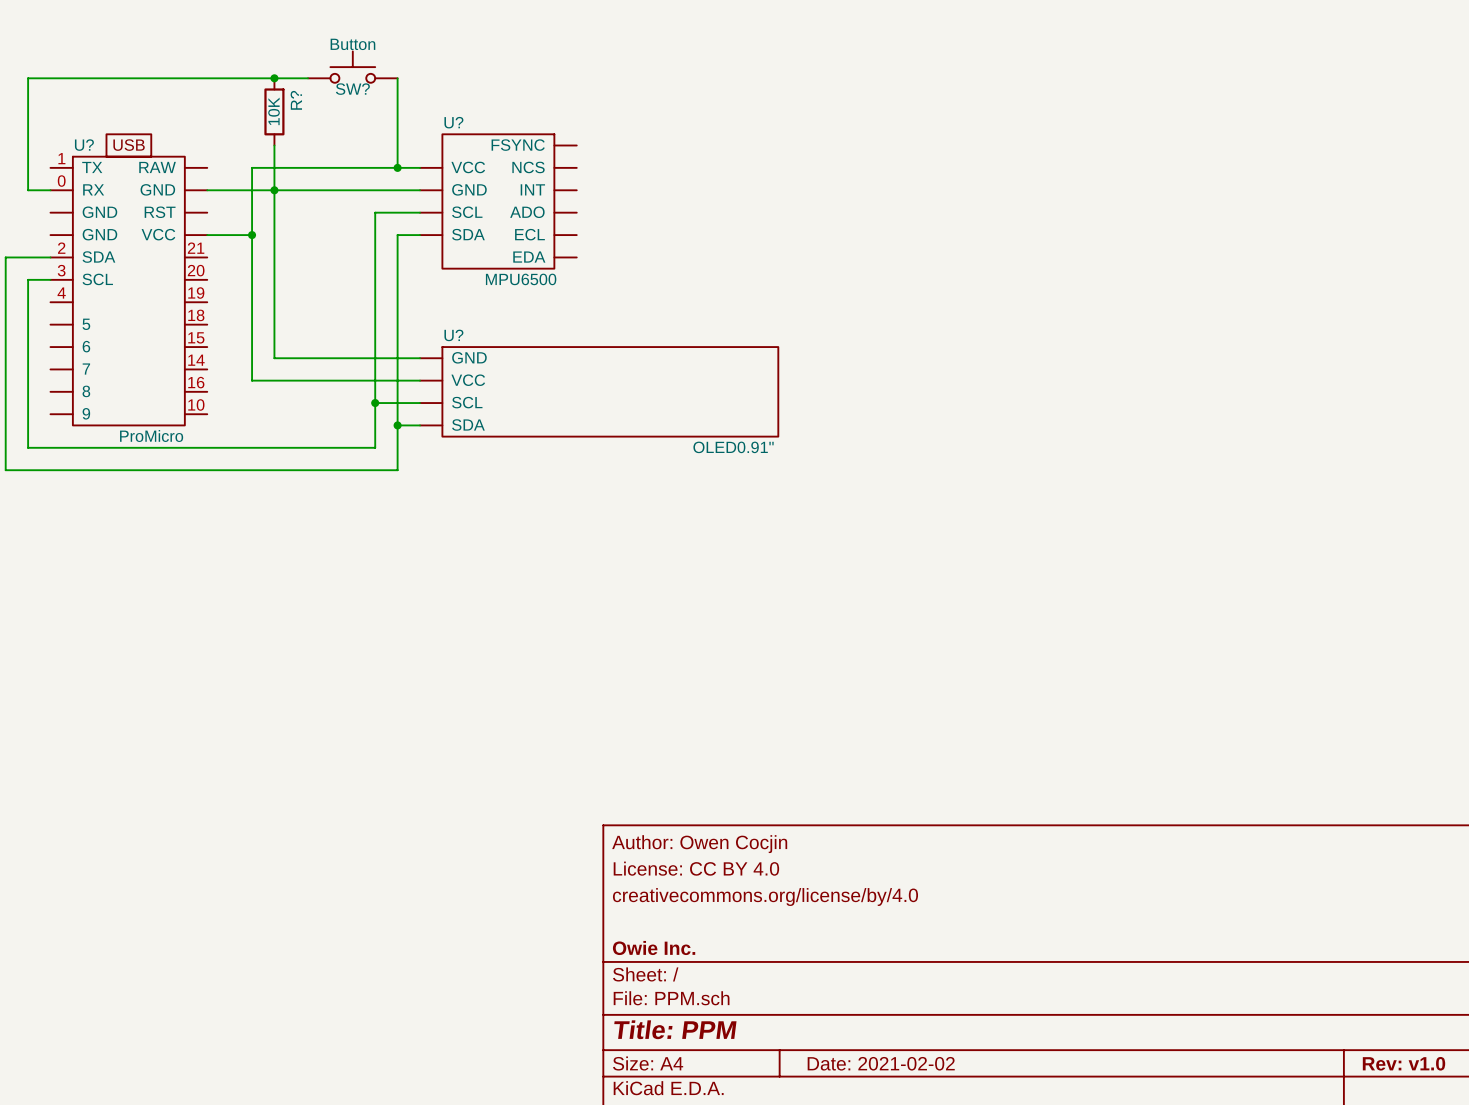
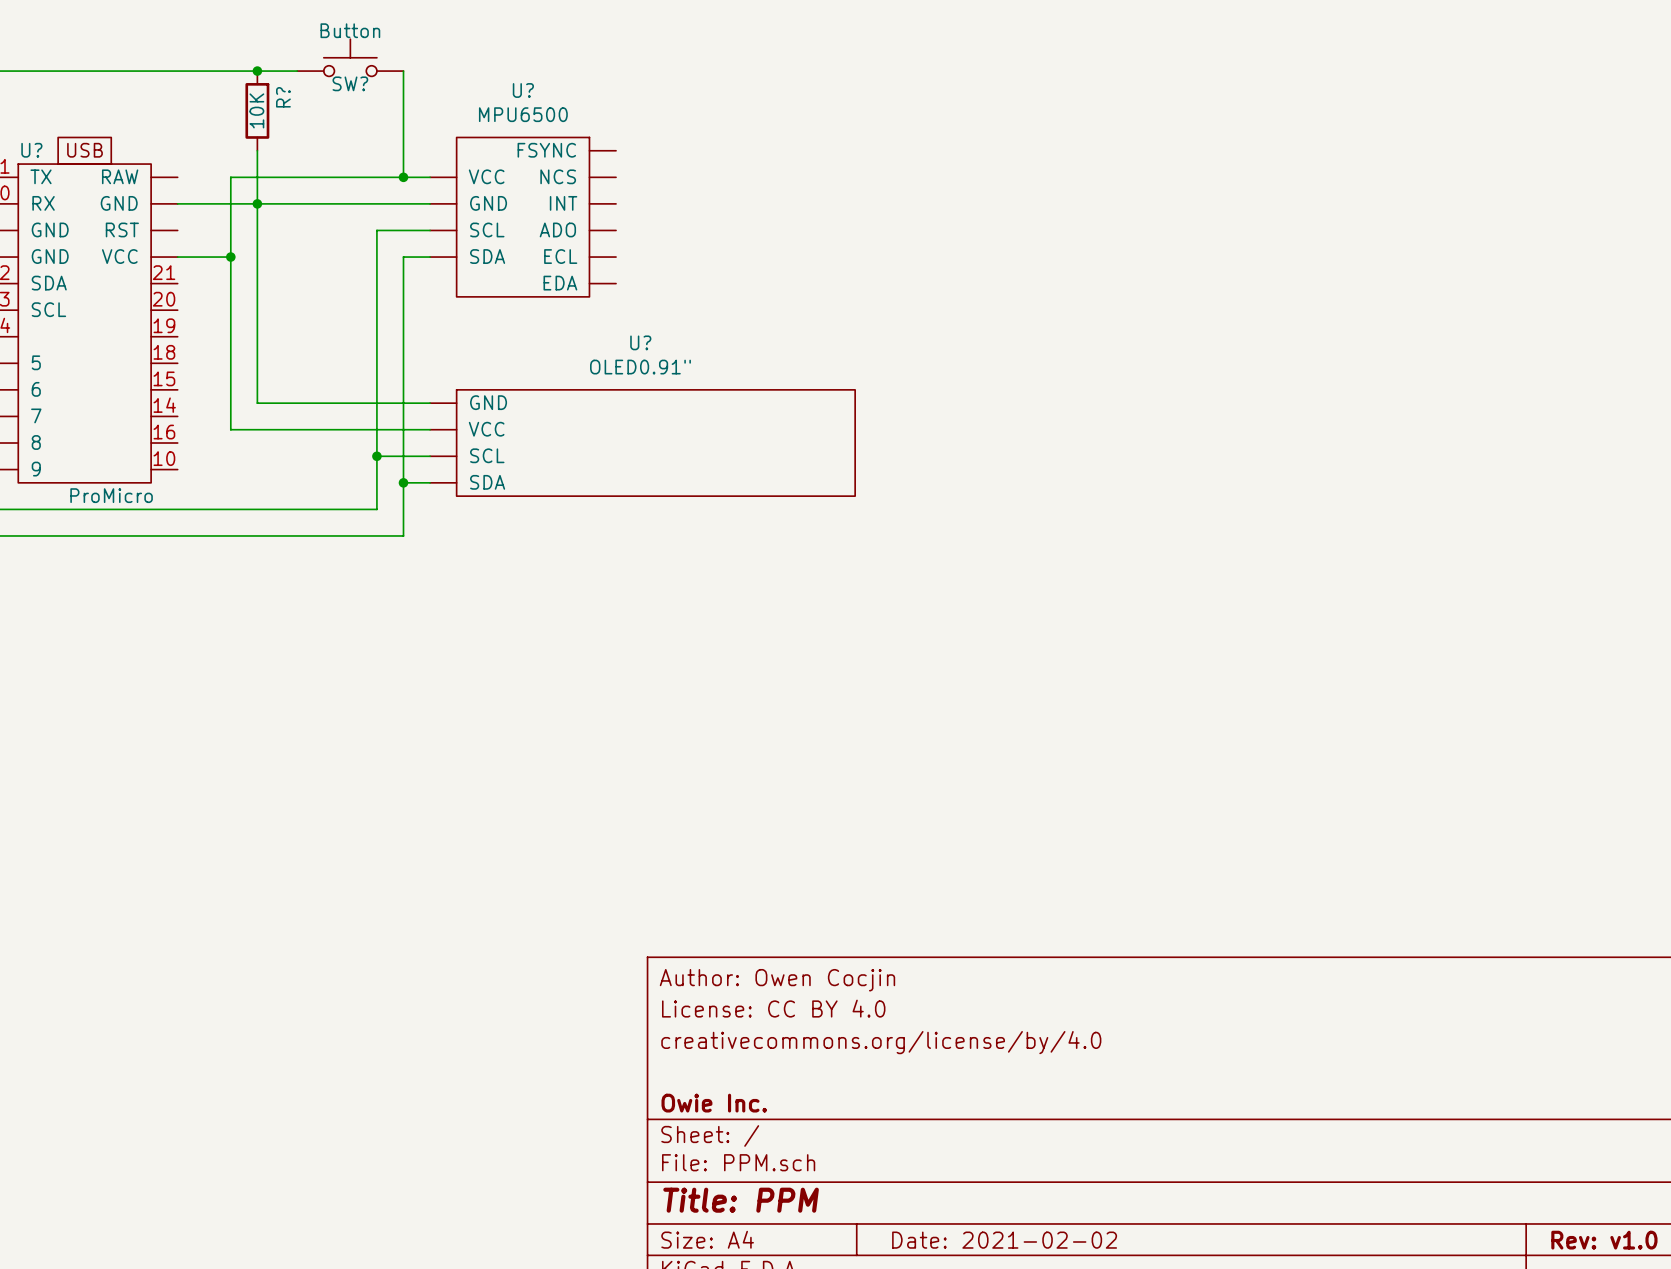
U? name position: U? (453, 122) -> U? (523, 90)
U? value position: MPU6500 (521, 279) -> MPU6500 (523, 114)
U? name position: U? (453, 335) -> U? (640, 342)
U? value position: OLED0.91" (733, 447) -> OLED0.91" (640, 367)

